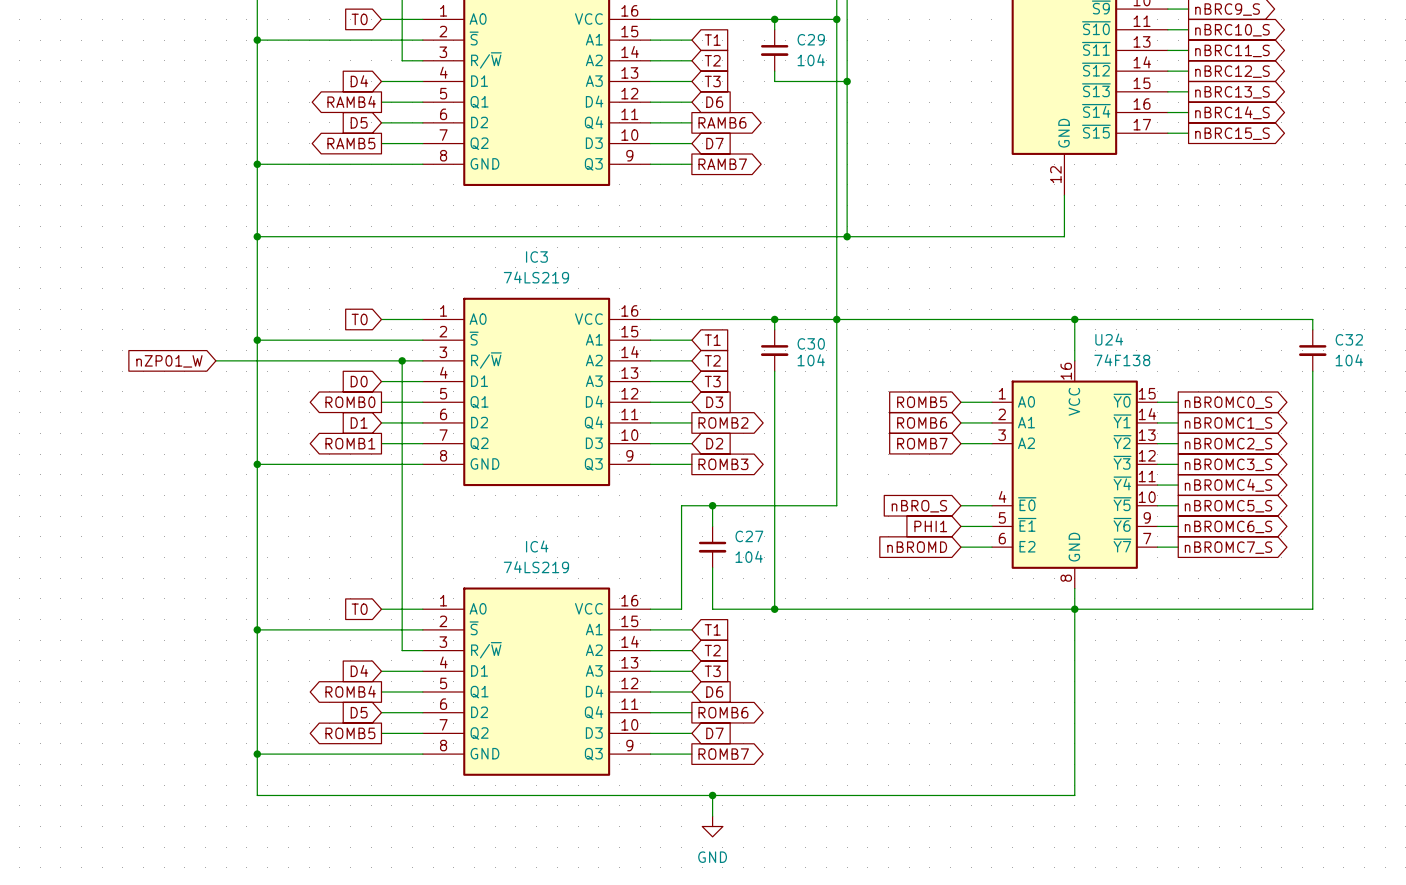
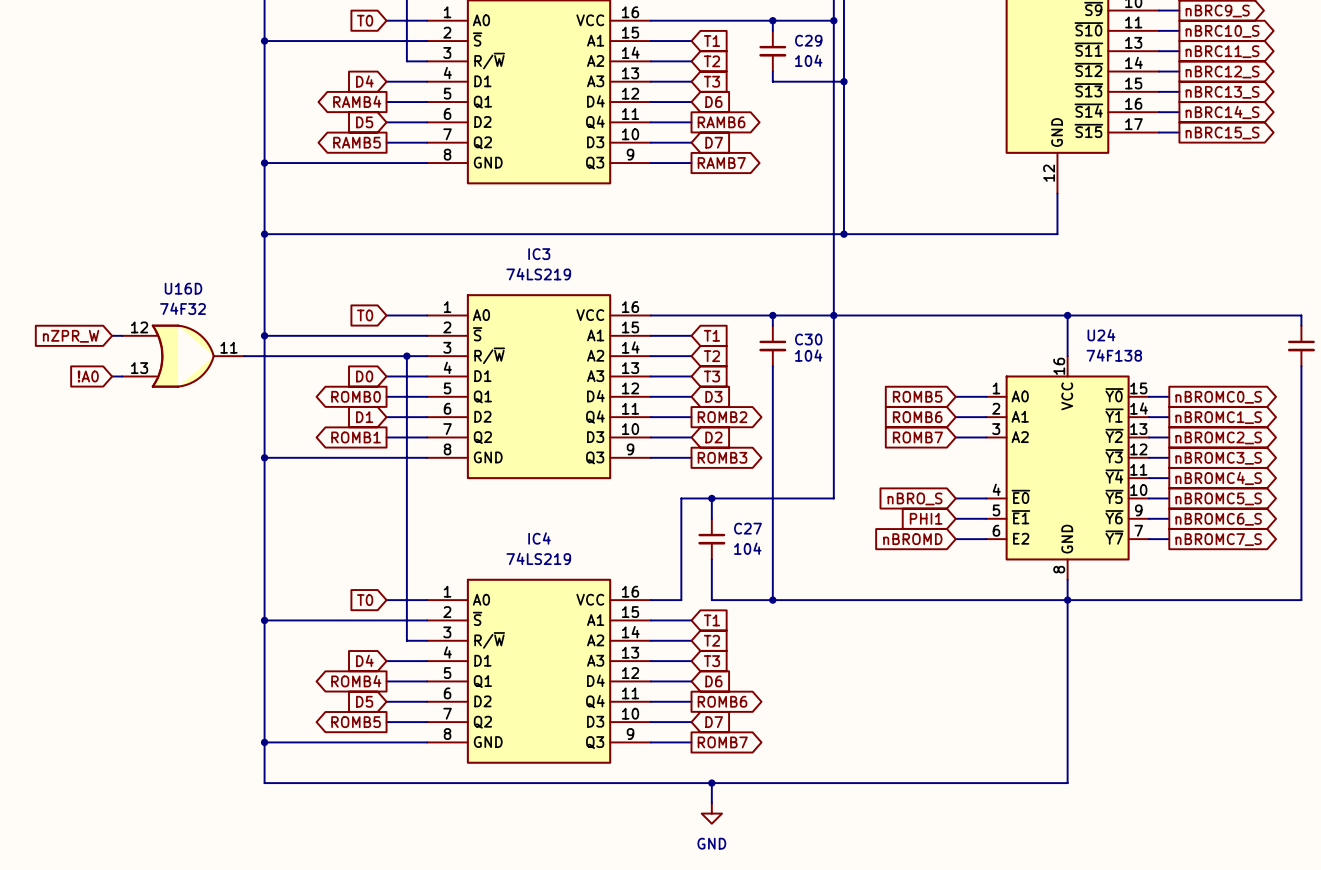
global label: none -> nZPR_W (71, 336)
wire: none -> (112, 335) (122, 335)
U16D: none -> 74F32 (183, 356)
global label: nZP01_W (169, 361) -> none
global label: none -> !A0 (88, 376)
wire: none -> (112, 376) (122, 376)

